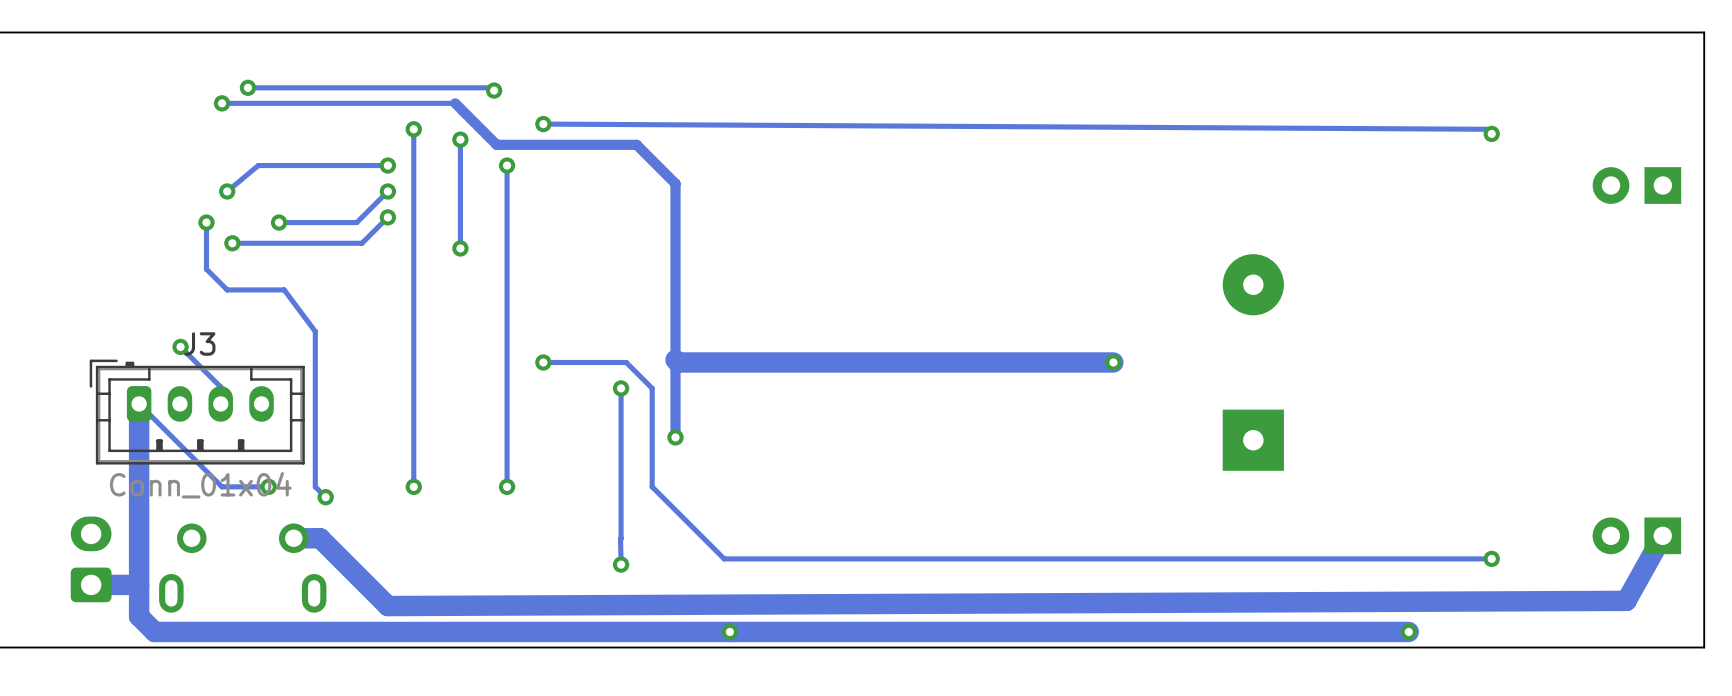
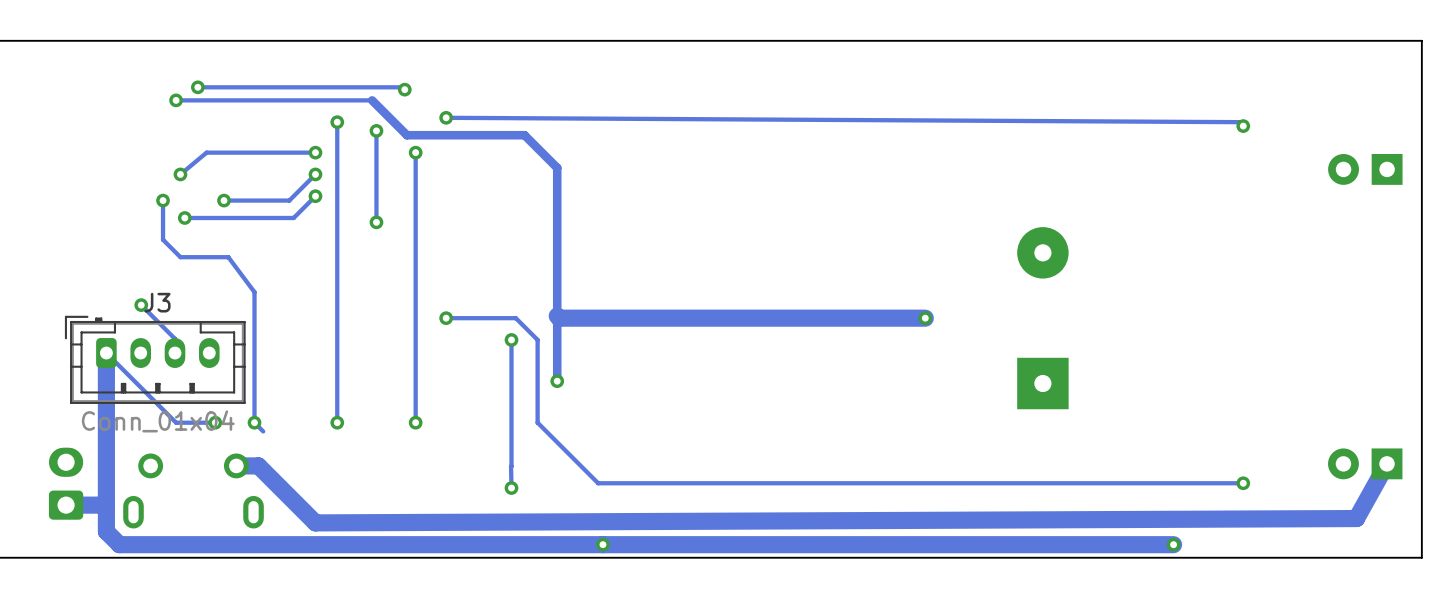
via position: (325, 497) -> (254, 422)

